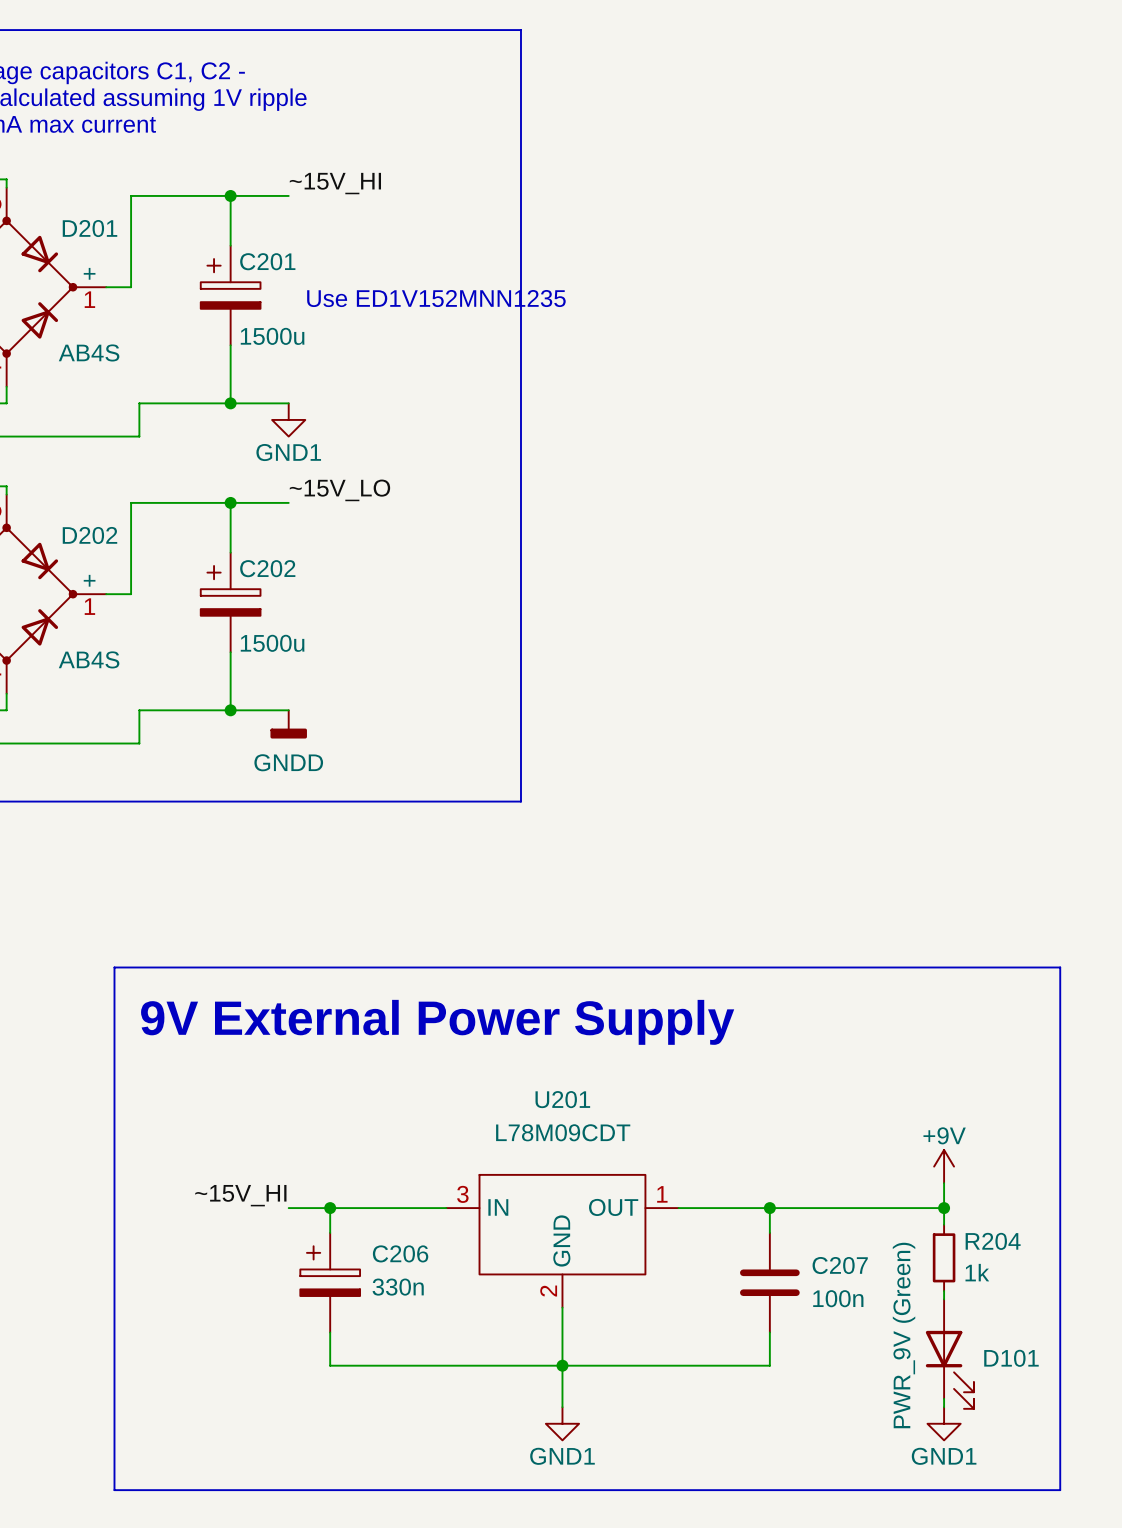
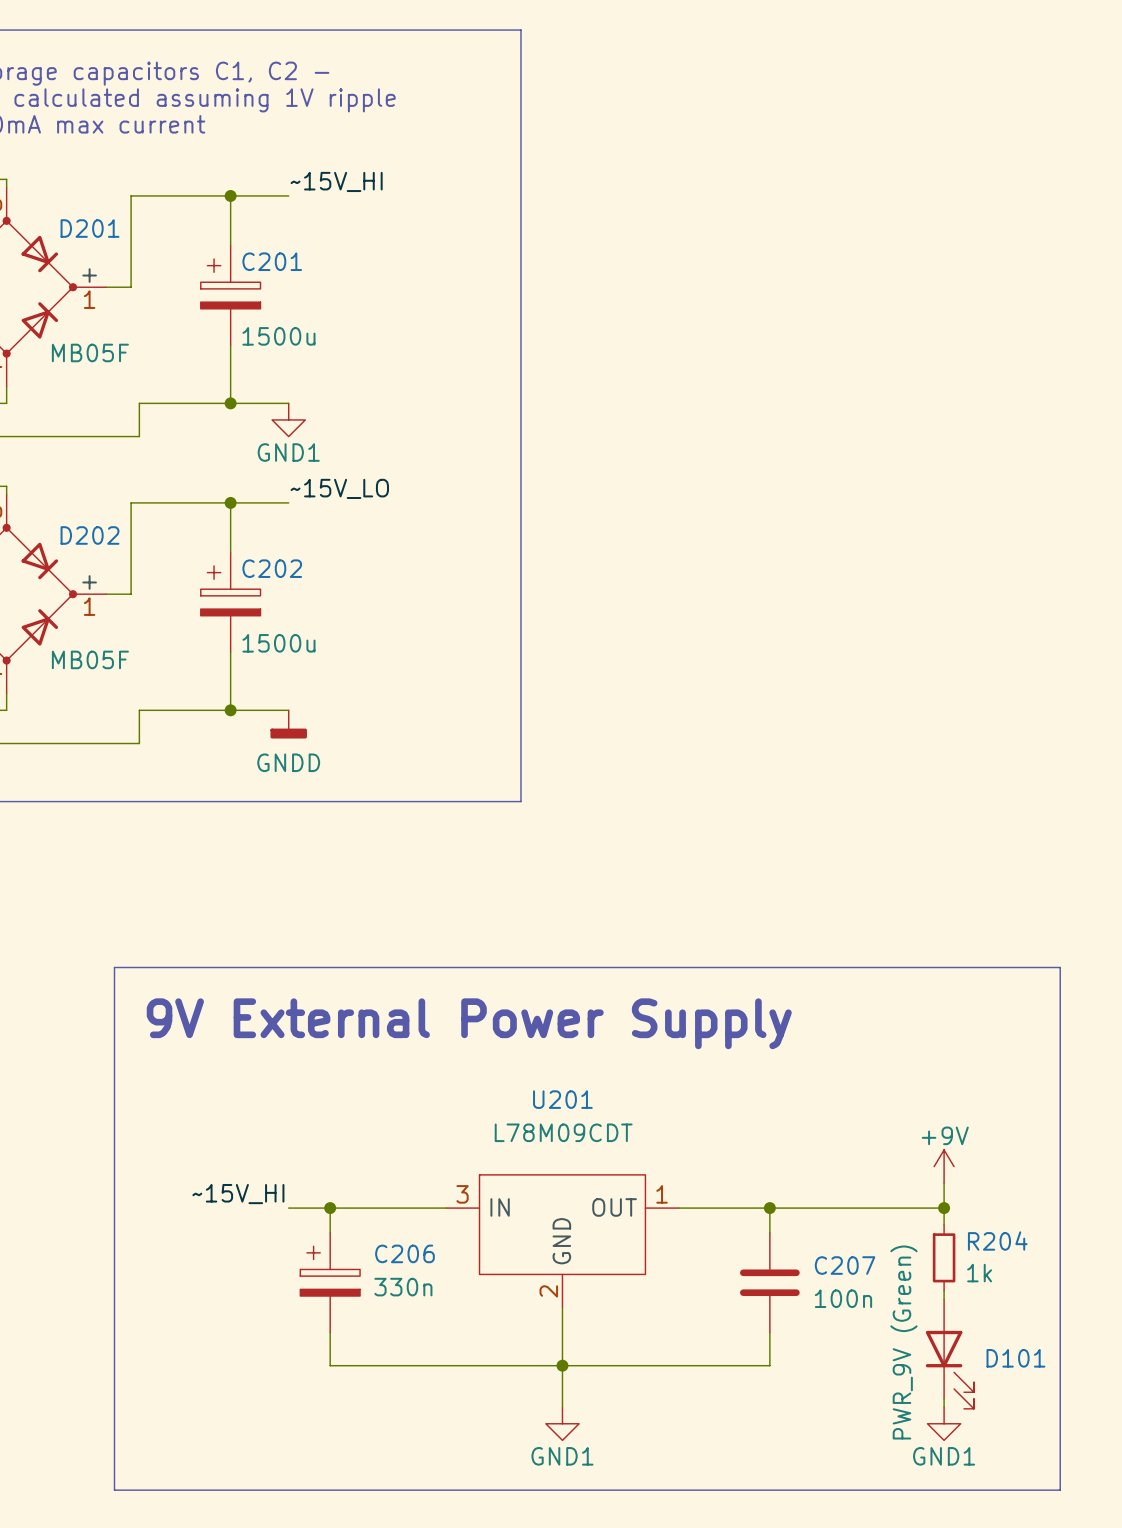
text: Use ED1V152MNN1235 (436, 298) -> none
D201 value: AB4S (89, 352) -> MB05F (90, 352)
D202 value: AB4S (89, 659) -> MB05F (90, 659)

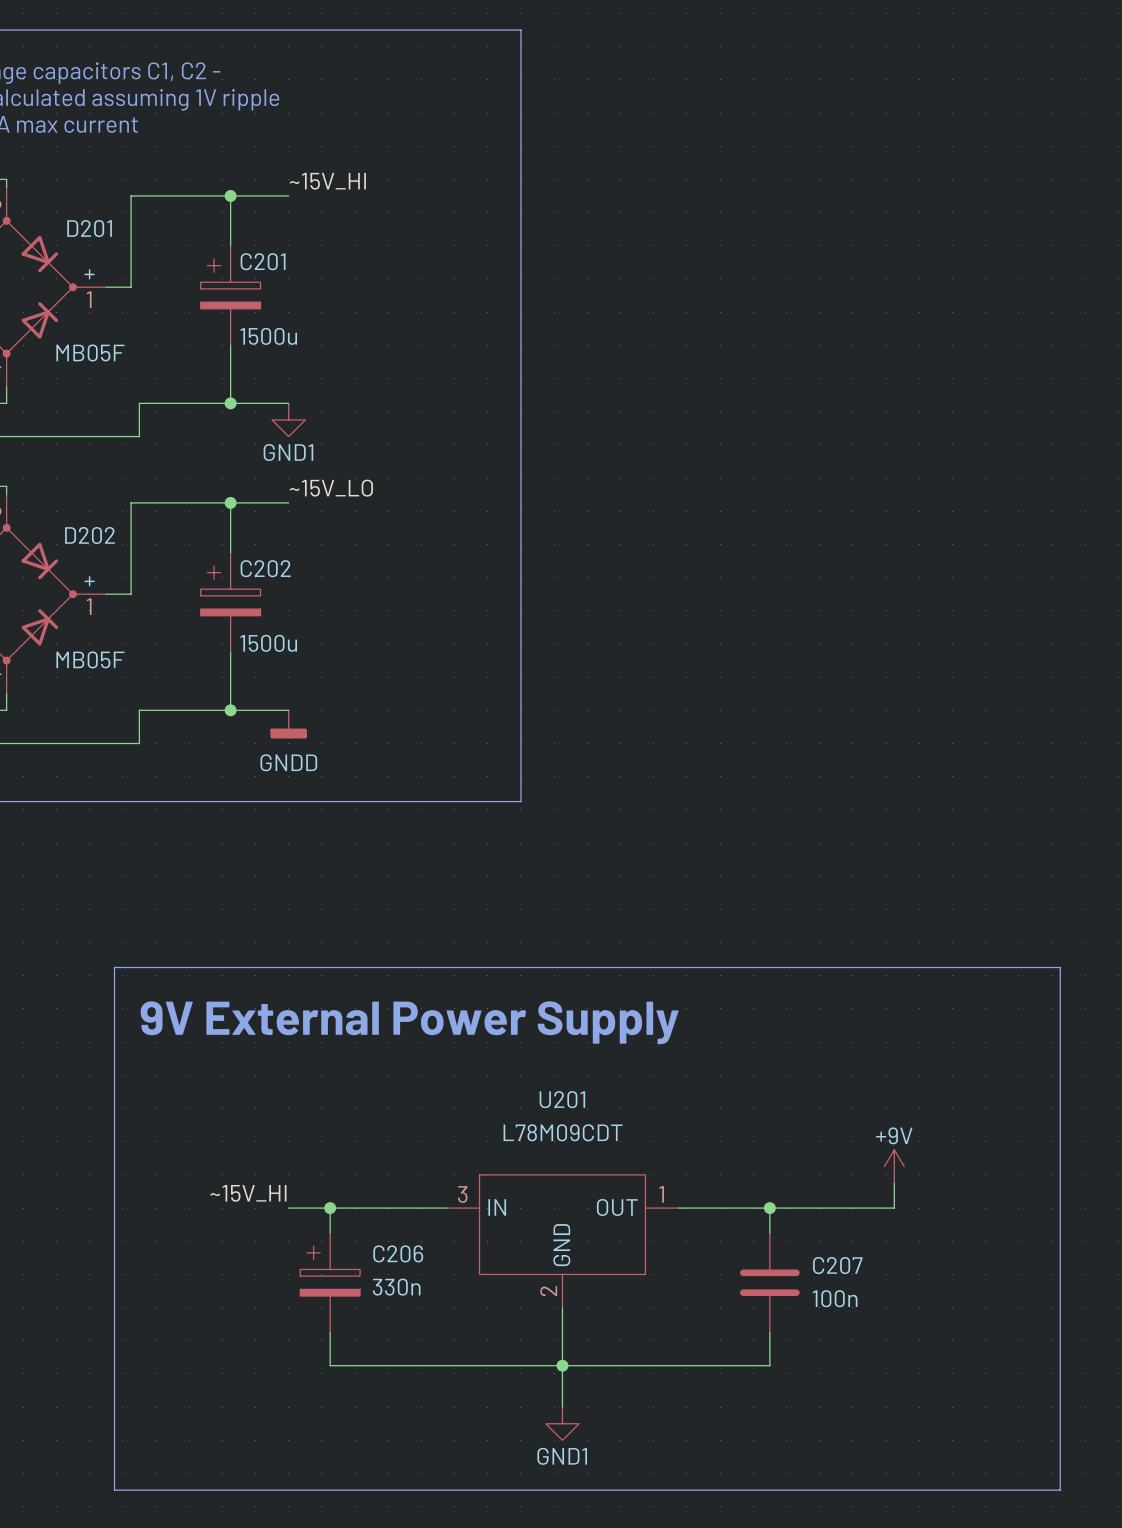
power symbol position: +9V (944, 1166) -> +9V (894, 1166)
wire: (944, 1183) (944, 1224) -> none
wire: (894, 1208) (944, 1208) -> (894, 1208) (894, 1183)
junction: (944, 1208) -> none
R204: 1k (944, 1257) -> none
wire: (944, 1291) (944, 1299) -> none
D101: PWR_9V (Green) (949, 1354) -> none
wire: (944, 1398) (944, 1407) -> none
power symbol: GND1 (944, 1423) -> none

